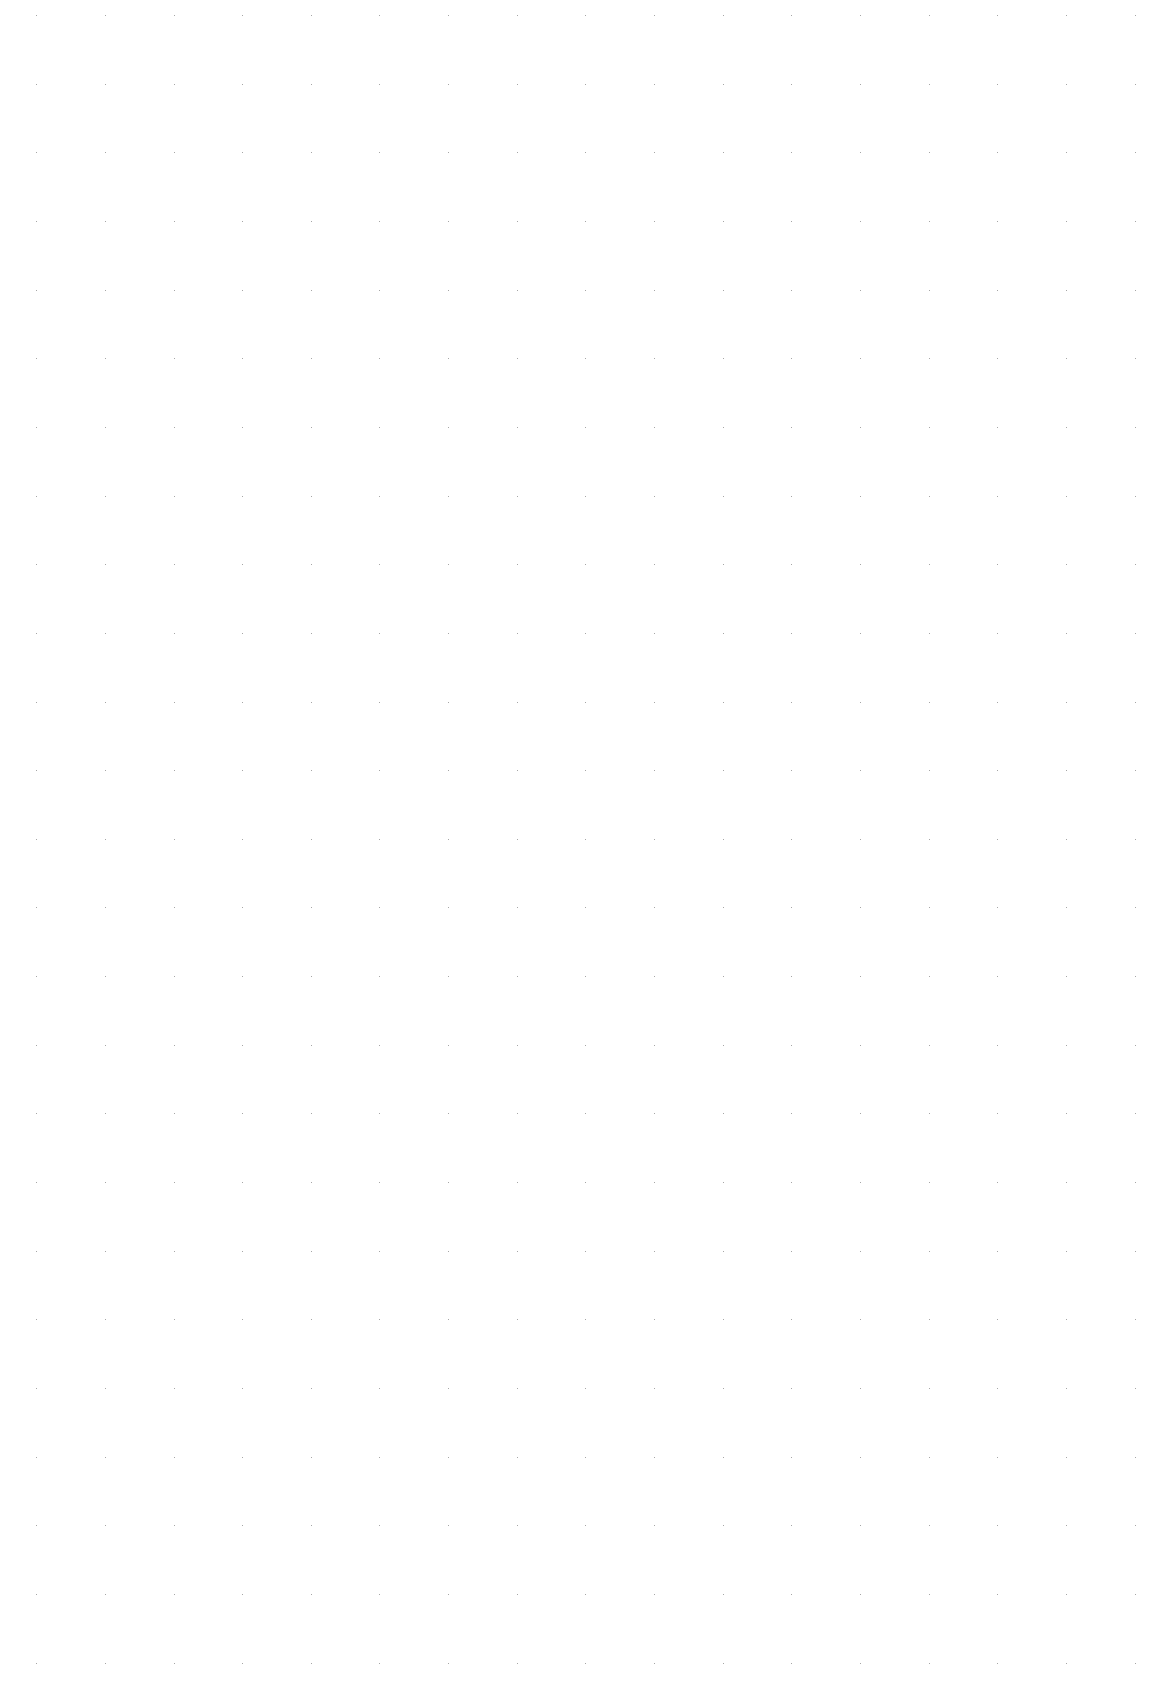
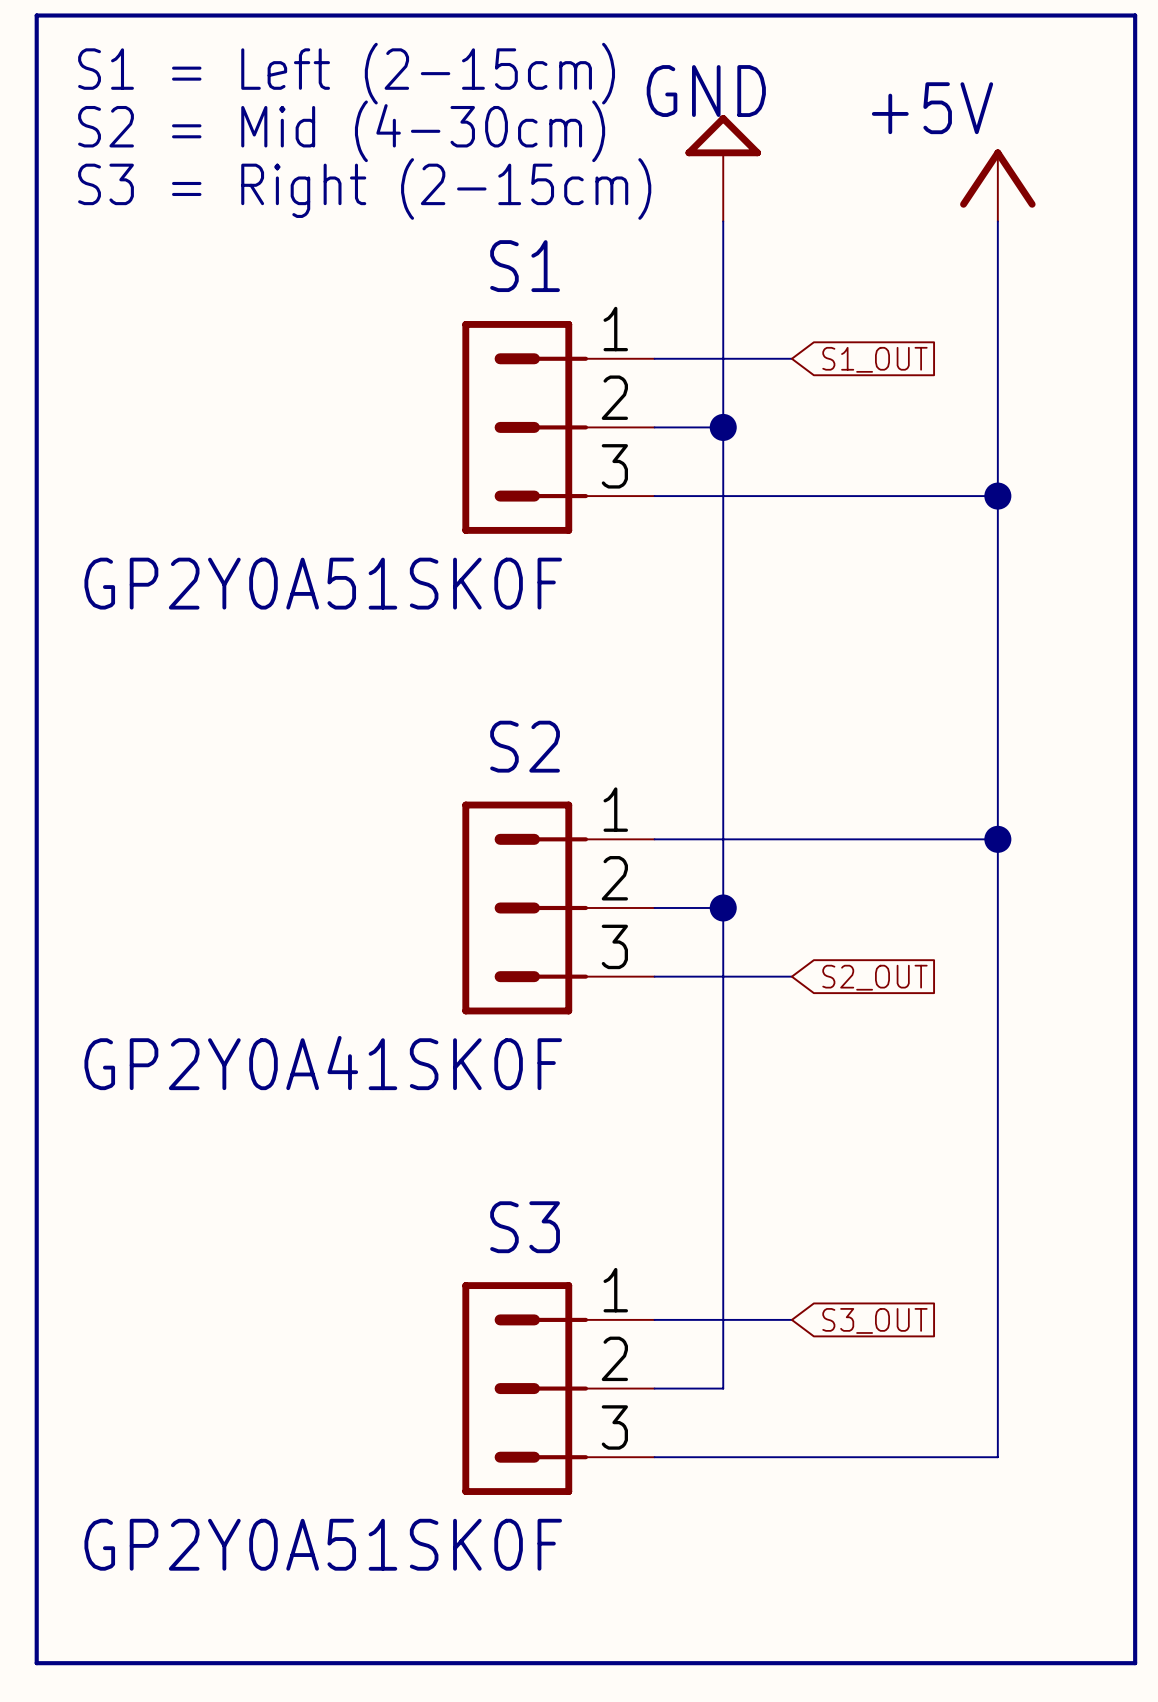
line: none -> (36, 15) (1135, 15) (1135, 1663) (36, 1663) (36, 15)
text: none -> S1 = Left (2-15cm) (346, 73)
text: none -> S2 = Mid (4-30cm) (341, 131)
power symbol: none -> GND (723, 168)
power symbol: none -> +5V (997, 185)
text: none -> S3 = Right (2-15cm) (364, 188)
wire: none -> (723, 221) (723, 1388) (654, 1388)
wire: none -> (997, 221) (997, 1457) (654, 1457)
wire: none -> (654, 358) (791, 358)
global label: none -> S1_OUT (874, 359)
S1: none -> GP2Y0A51SK0F (558, 427)
wire: none -> (654, 427) (723, 427)
junction: none -> (723, 427)
wire: none -> (654, 496) (997, 496)
junction: none -> (997, 496)
wire: none -> (654, 839) (997, 839)
junction: none -> (997, 839)
S2: none -> GP2Y0A41SK0F (558, 907)
wire: none -> (654, 907) (723, 907)
junction: none -> (723, 907)
wire: none -> (654, 976) (791, 976)
global label: none -> S2_OUT (874, 977)
wire: none -> (654, 1319) (791, 1319)
global label: none -> S3_OUT (874, 1320)
S3: none -> GP2Y0A51SK0F (558, 1388)

